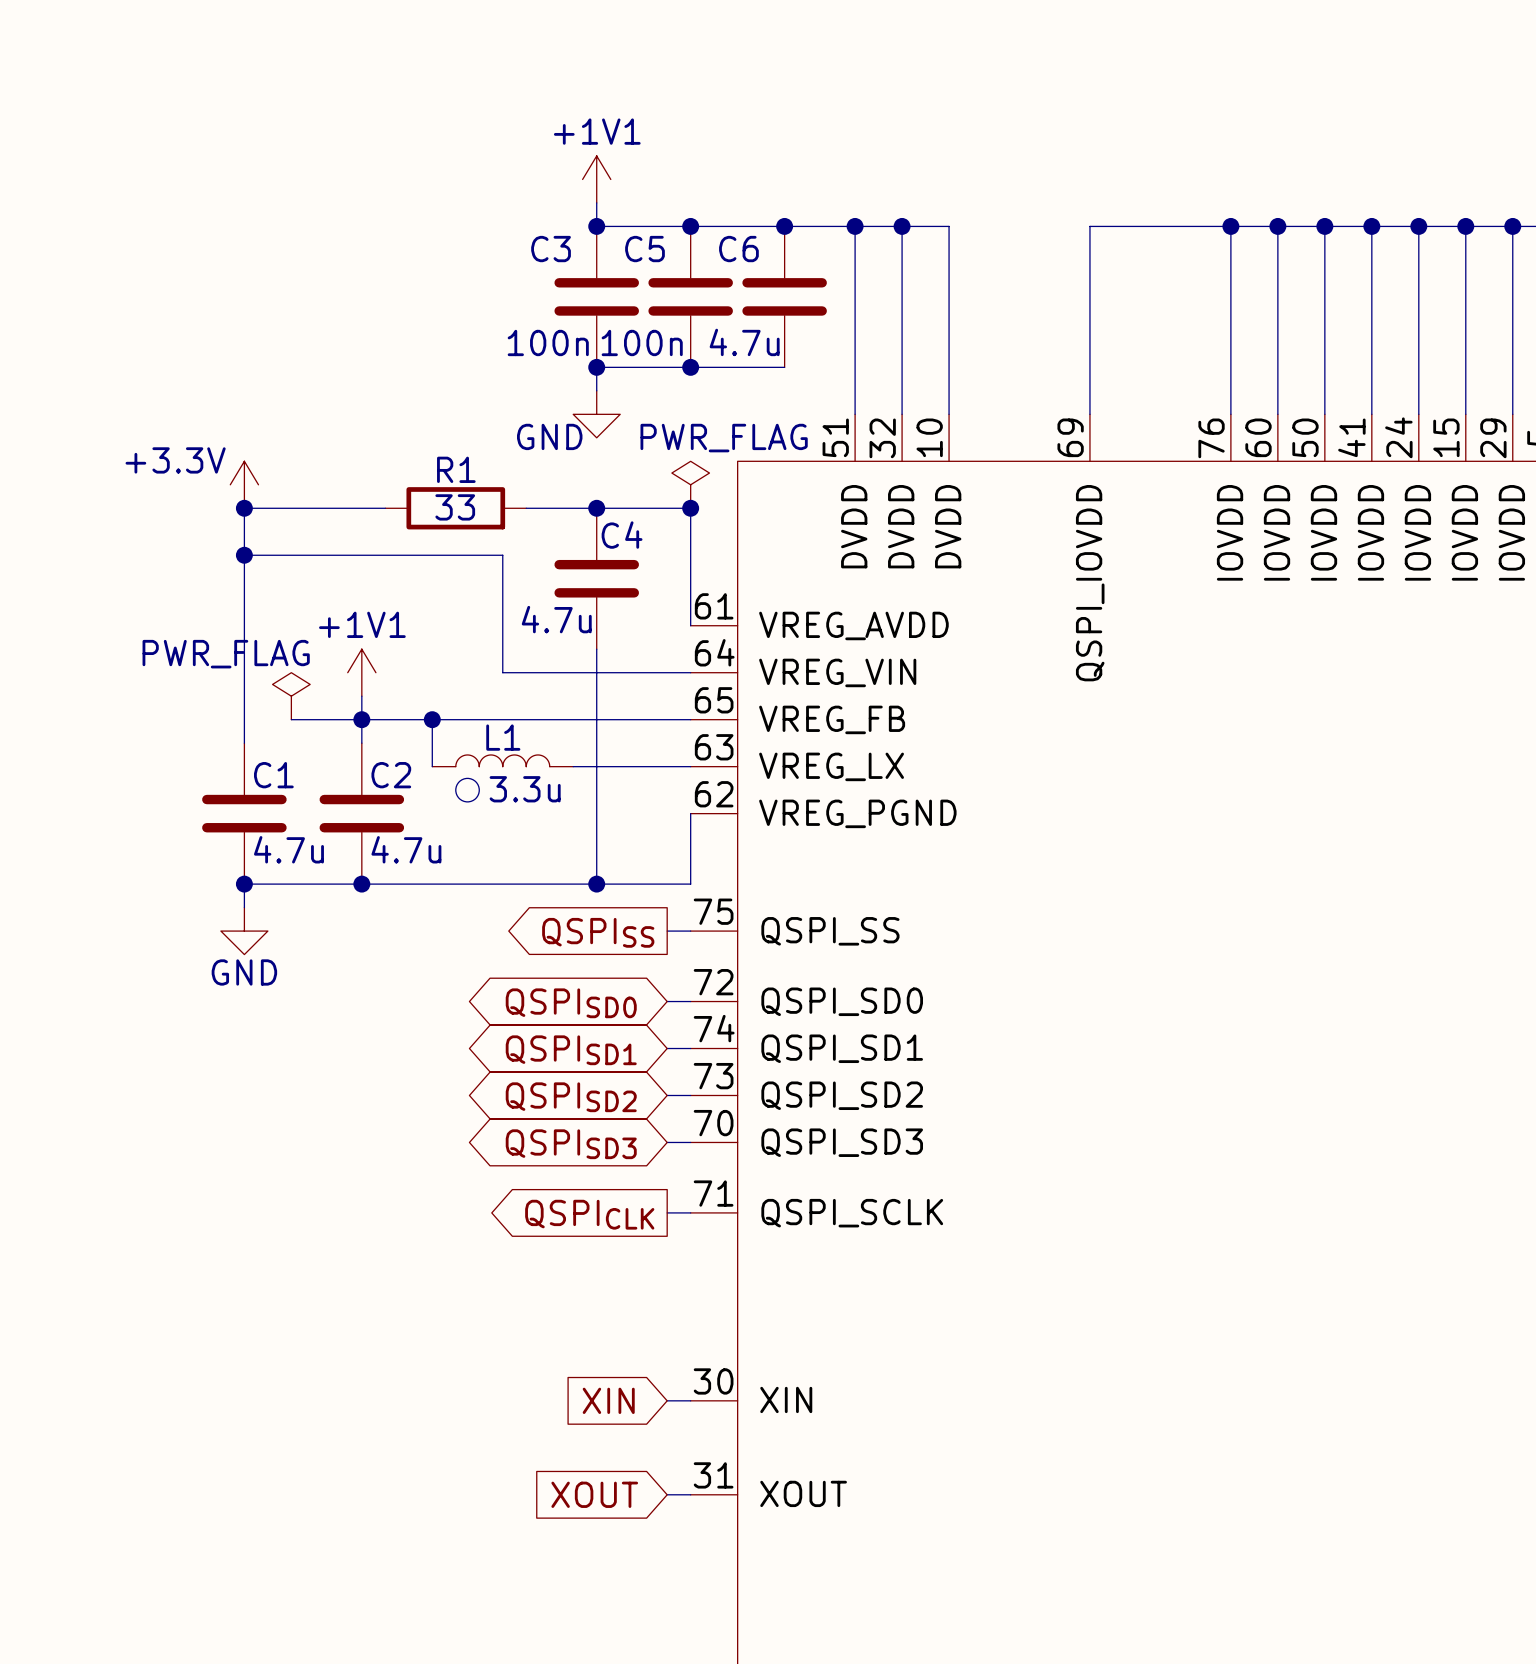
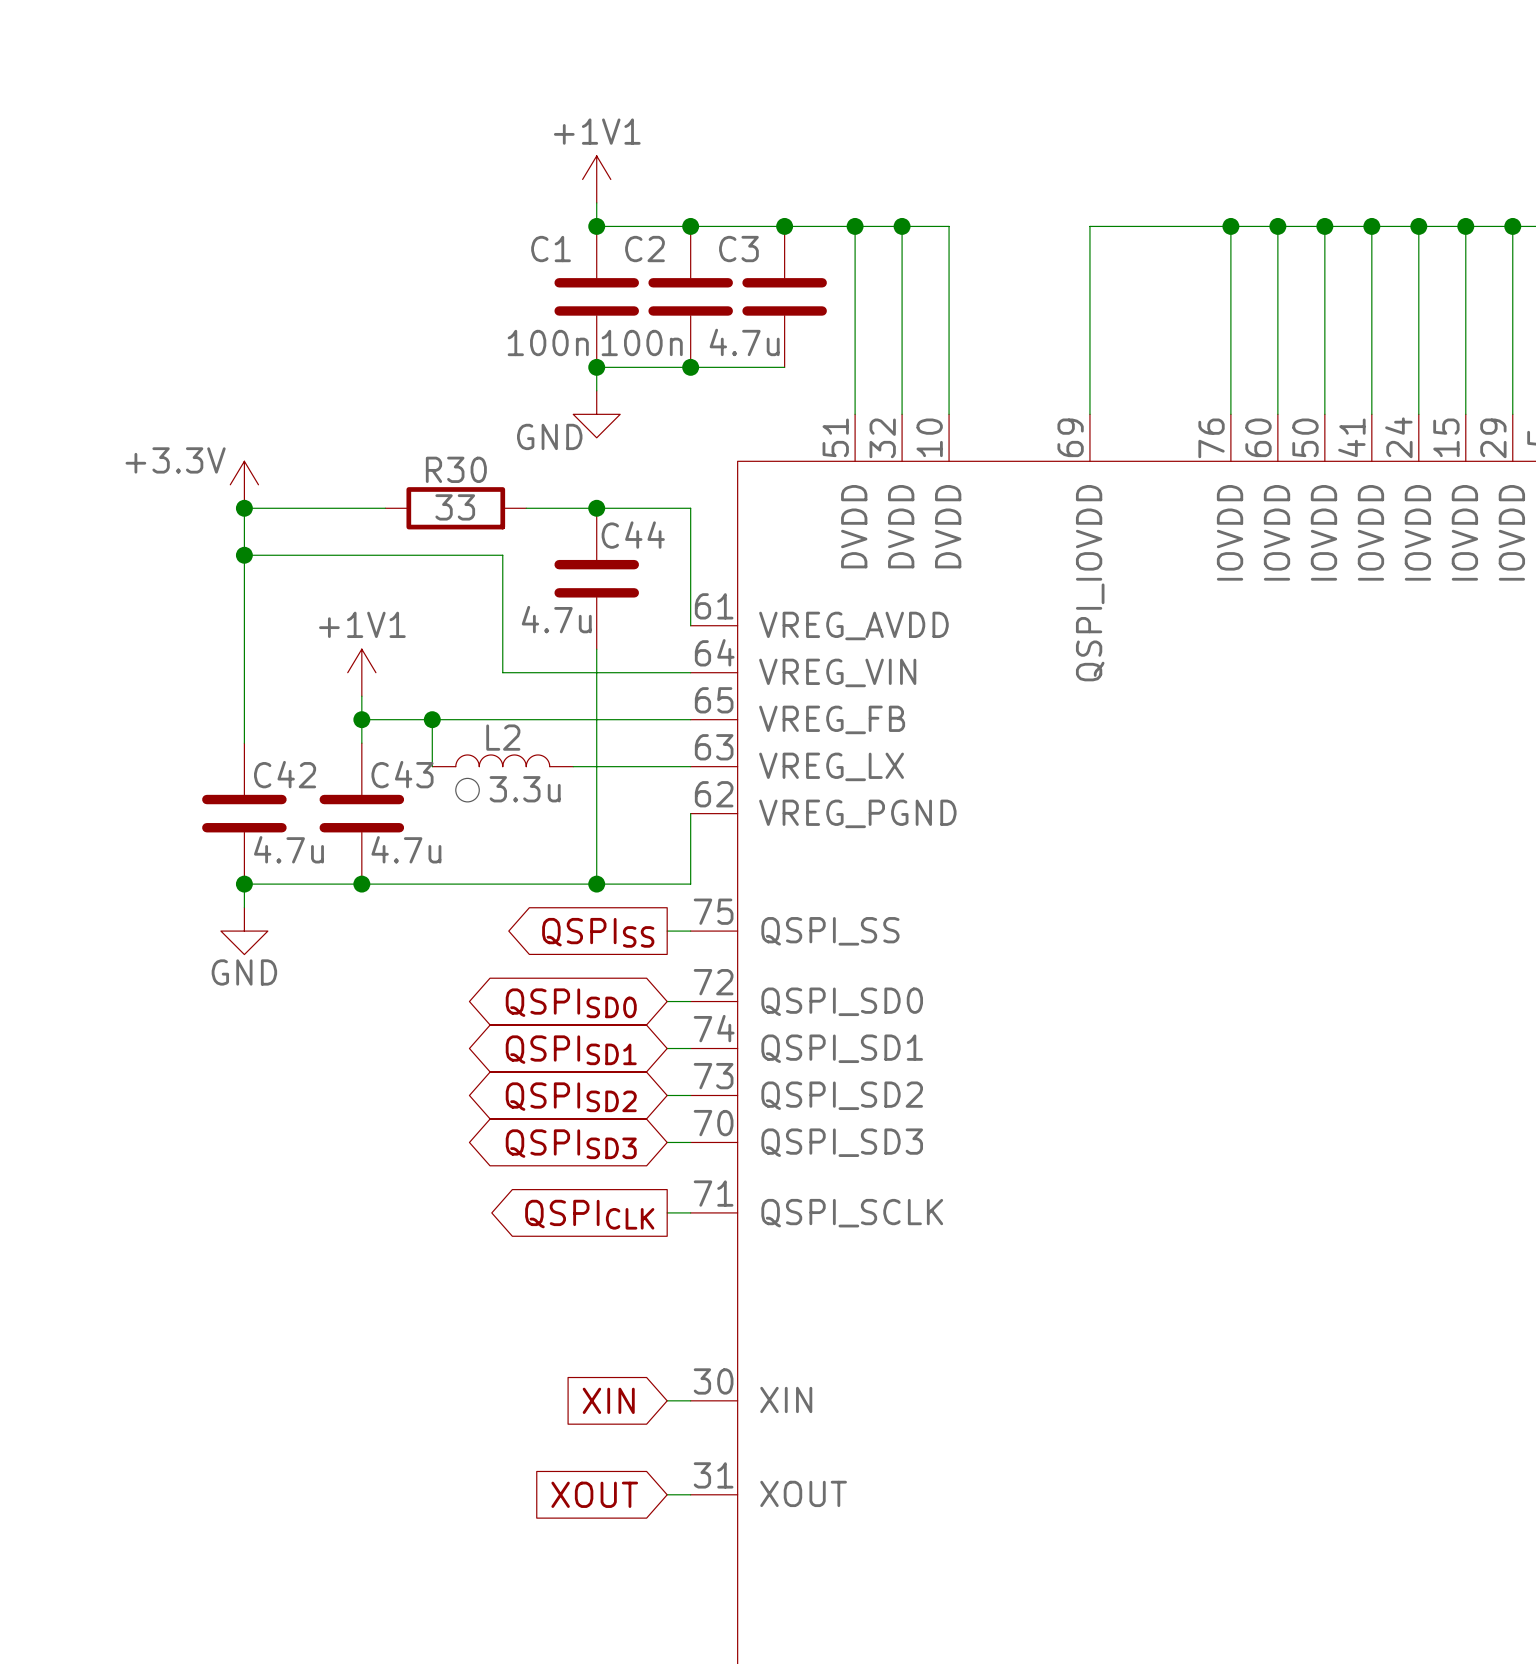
C3 name: C3 (551, 249) -> C1 (551, 249)
C5 name: C5 (644, 249) -> C2 (644, 249)
C6 name: C6 (738, 249) -> C3 (738, 249)
R1 name: R1 (456, 469) -> R30 (456, 469)
power symbol: PWR_FLAG (690, 484) -> none
junction: (690, 508) -> none
C4 name: C4 (622, 535) -> C44 (633, 535)
power symbol: PWR_FLAG (291, 696) -> none
wire: (291, 719) (361, 719) -> none
L1 name: L1 (503, 737) -> L2 (503, 737)
C1 name: C1 (273, 775) -> C42 (285, 774)
C2 name: C2 (391, 775) -> C43 (402, 774)

